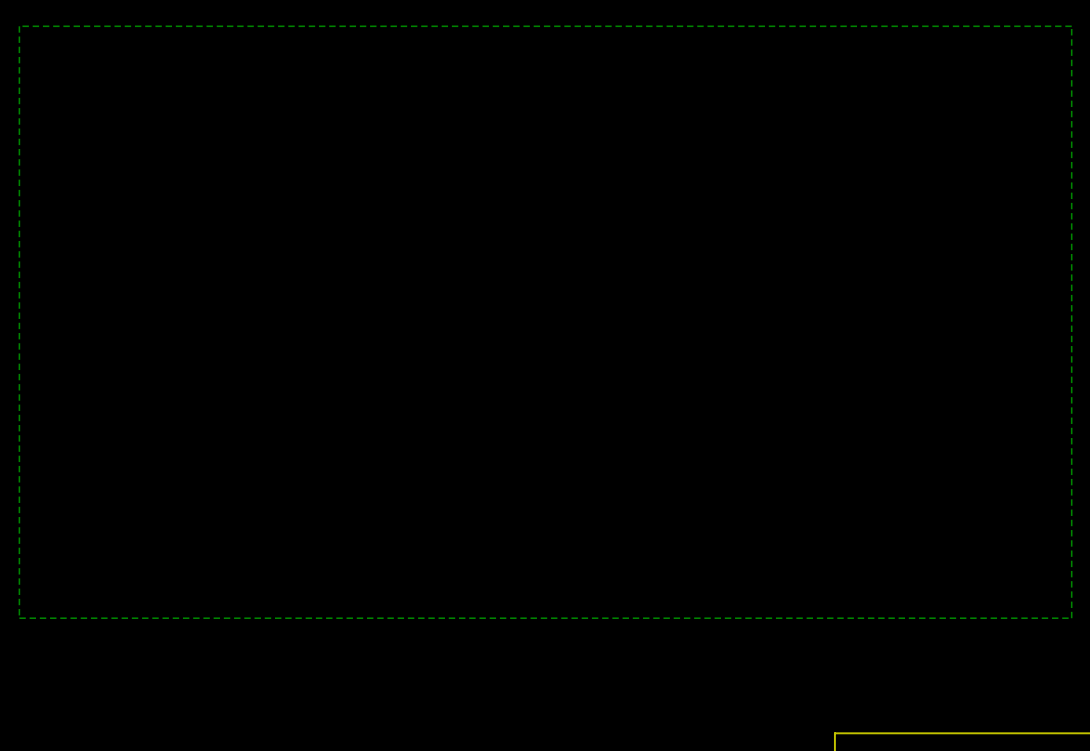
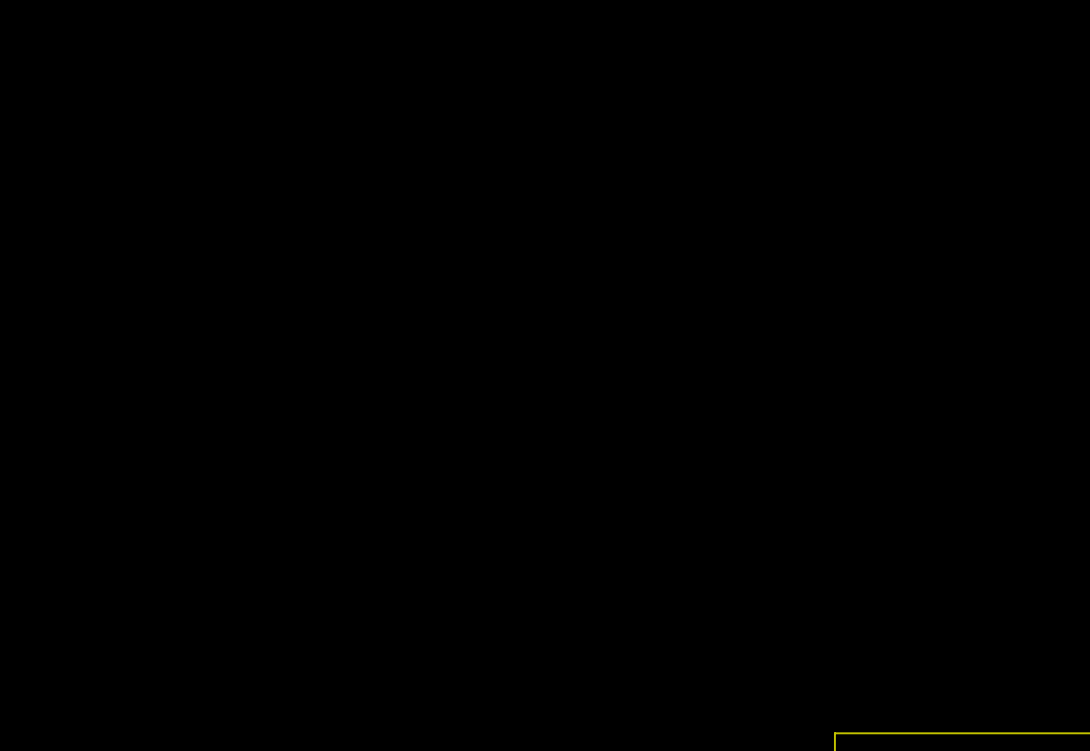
bottom zone outline: (19, 26) (19, 618) (1071, 618) (1071, 26) (19, 26) -> none

